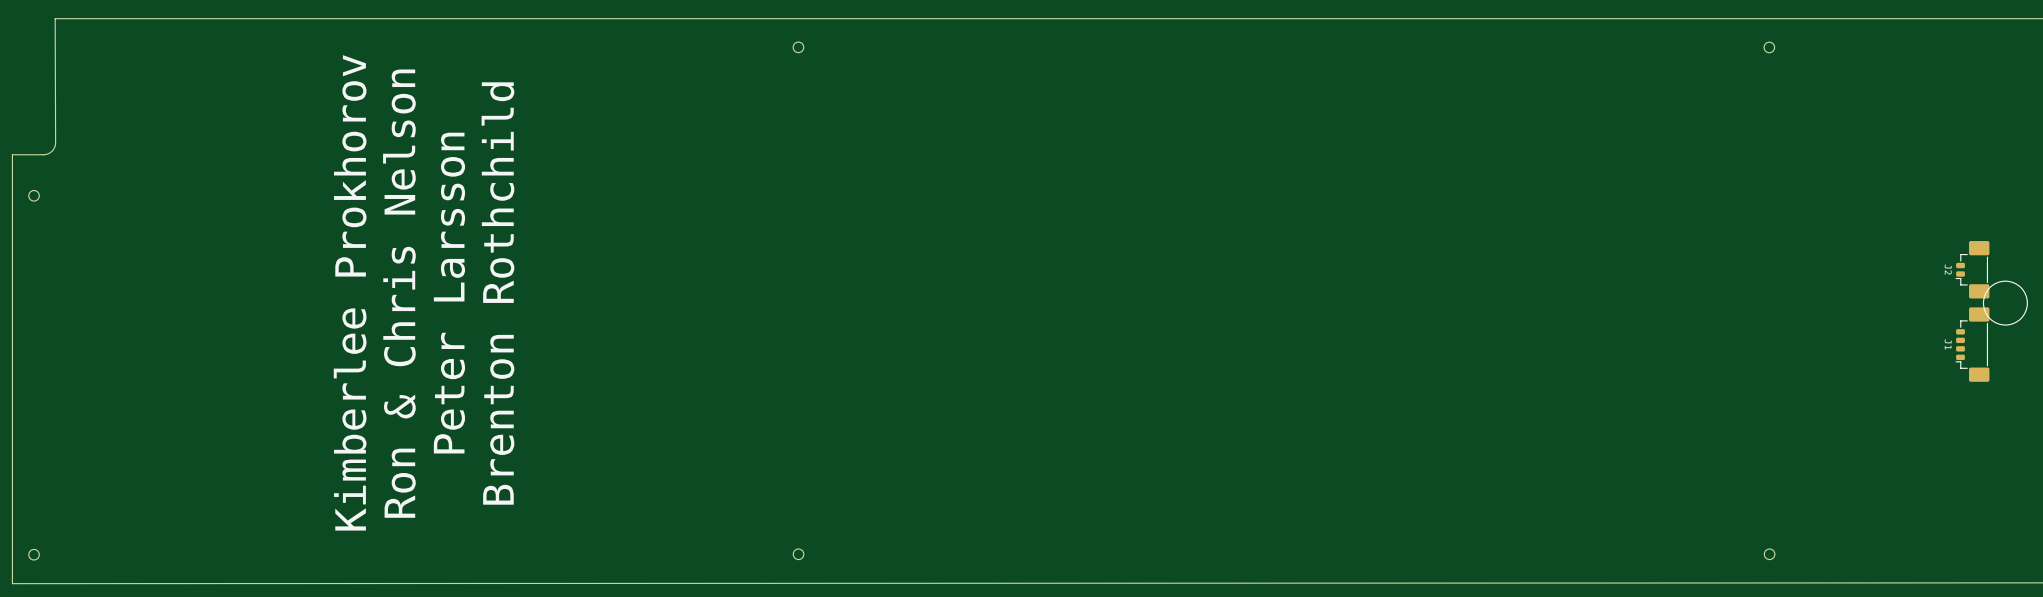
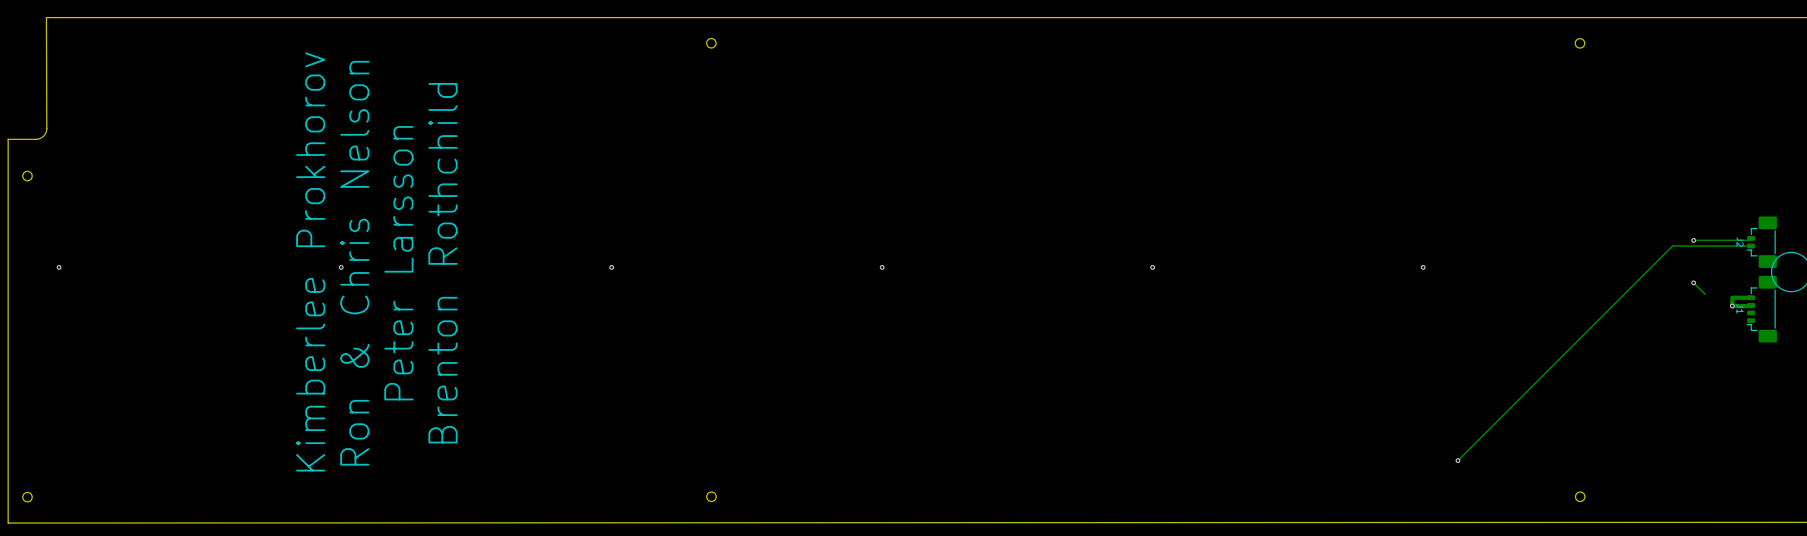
track: none -> (1751, 238) (1749, 240) (1693, 240)
via: none -> (1693, 240)
track: none -> (1751, 246) (1672, 246) (1457, 460)
via: none -> (59, 267)
via: none -> (341, 267)
via: none -> (611, 267)
via: none -> (882, 267)
via: none -> (1152, 267)
via: none -> (1423, 267)
track: none -> (1693, 282) (1705, 294)
via: none -> (1693, 282)
track: none -> (1751, 297) (1732, 297) (1732, 306) (1751, 305)
via: none -> (1732, 306)
via: none -> (1457, 460)

